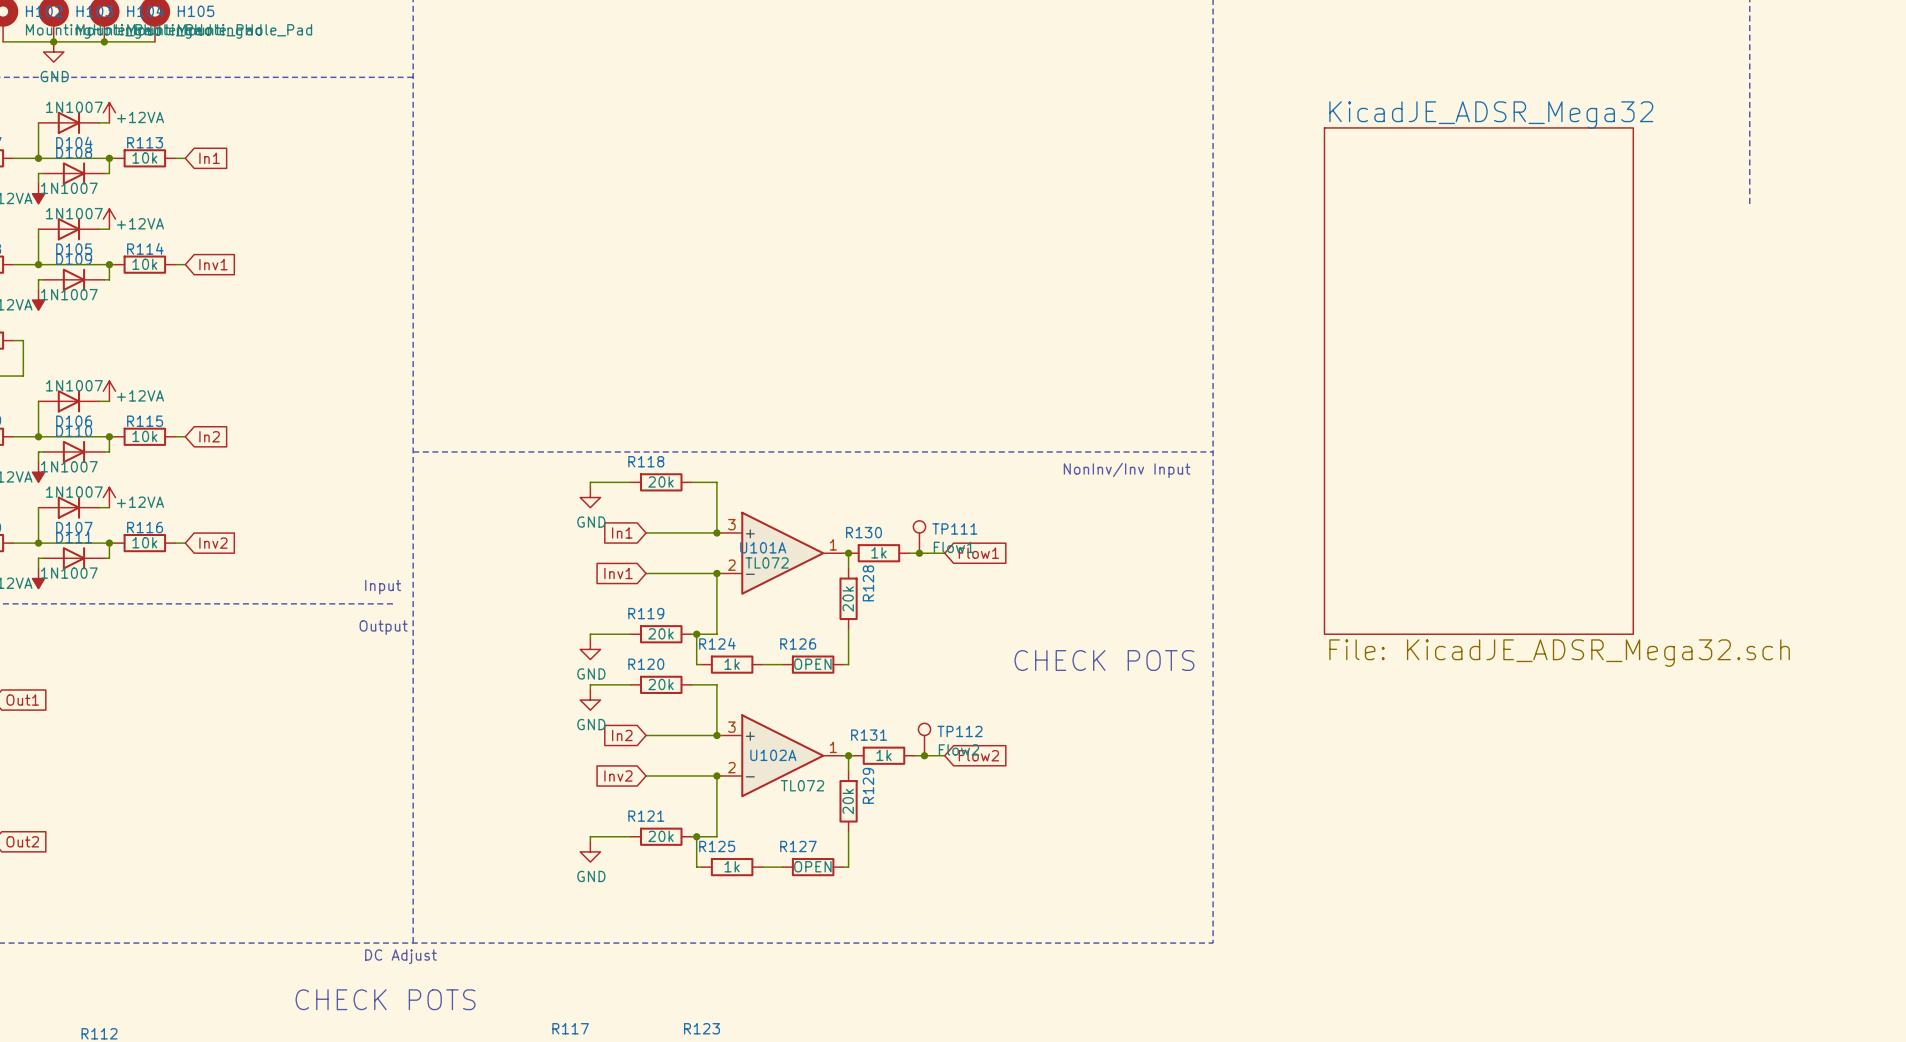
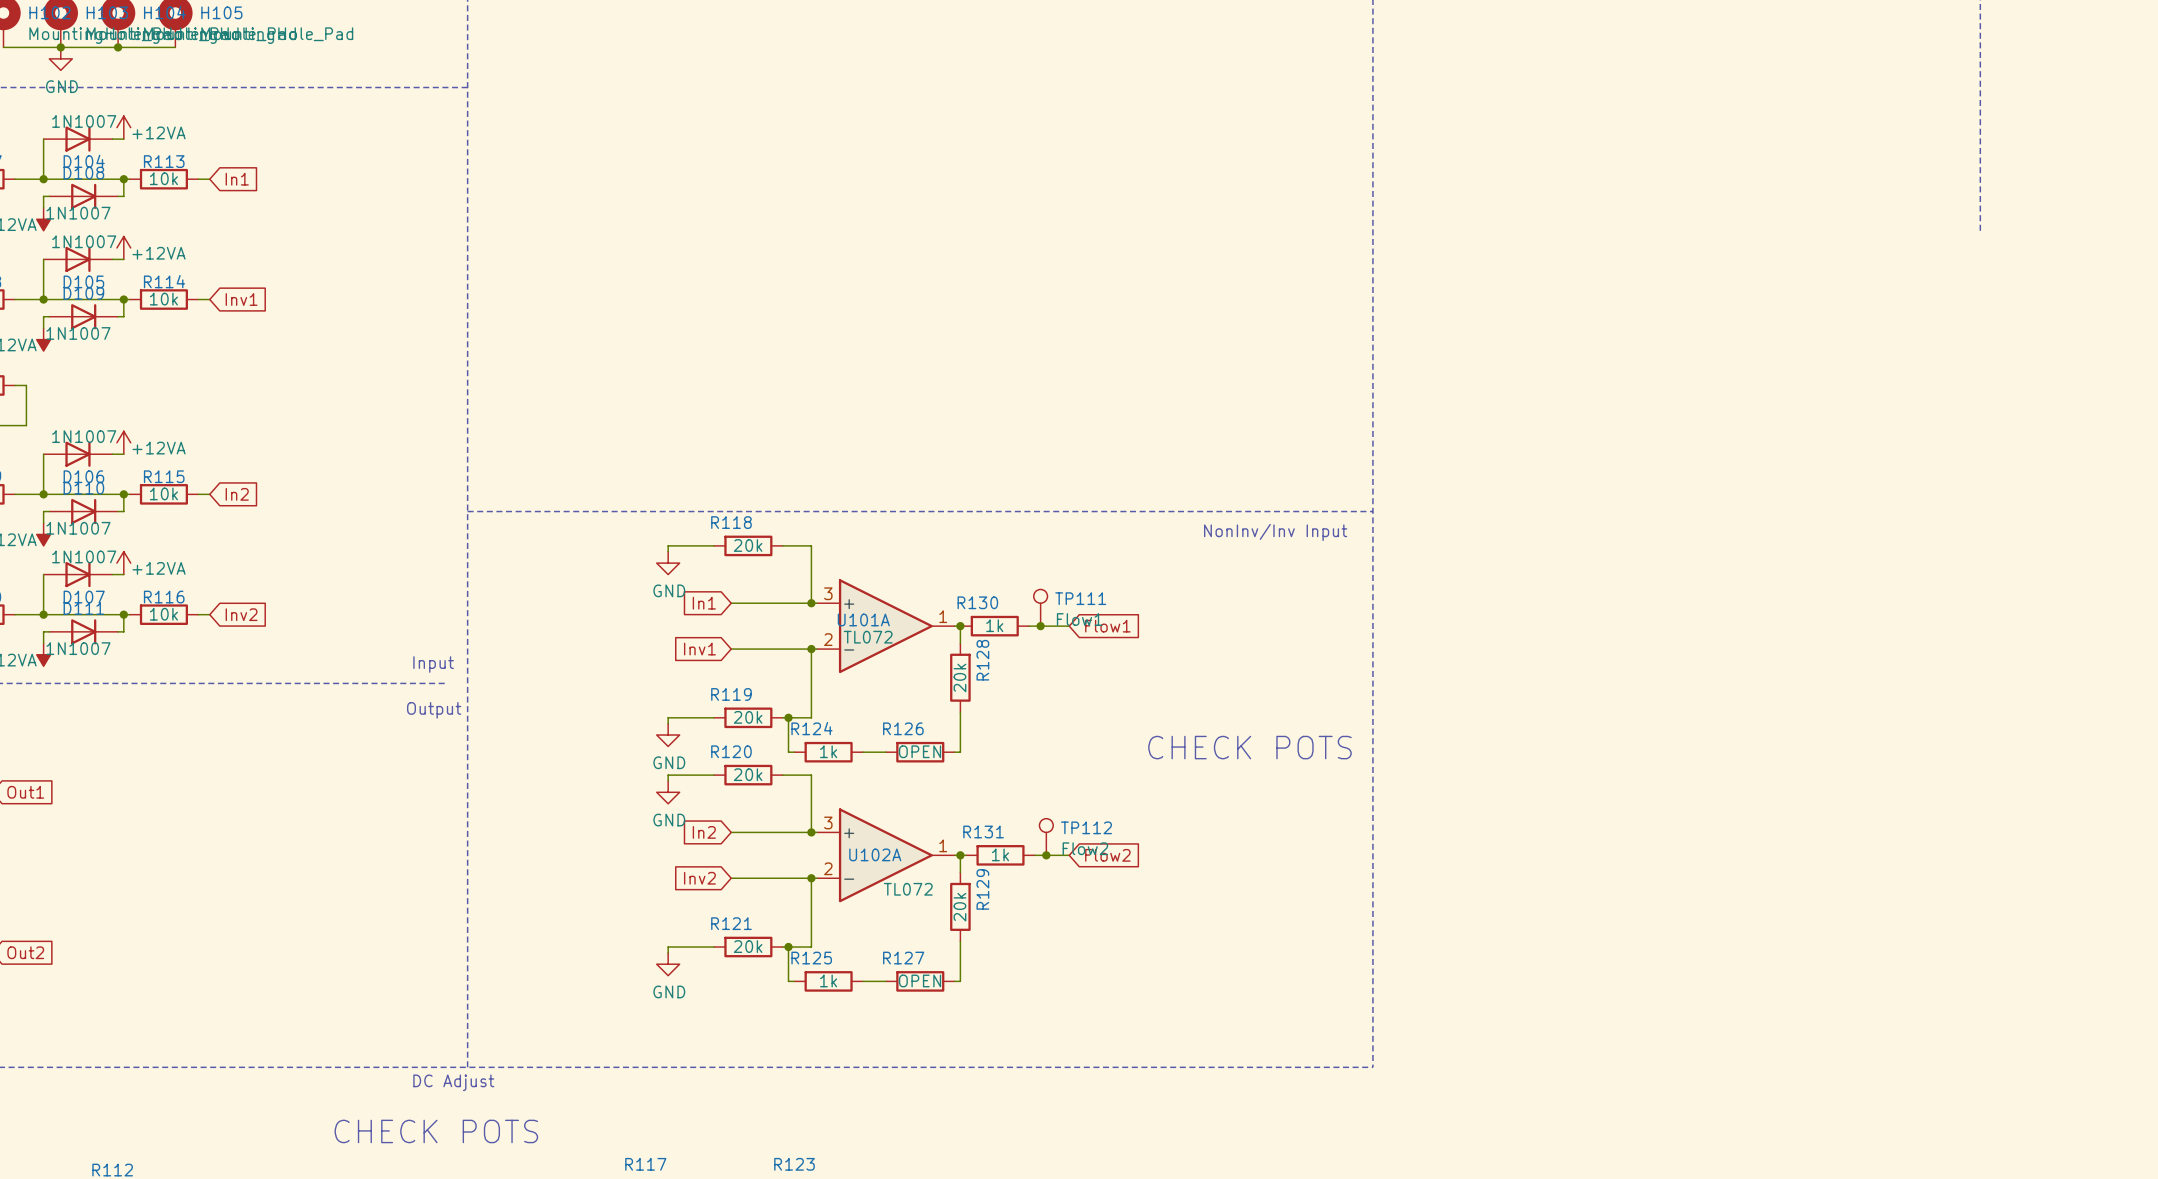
sheet KicadJE_ADSR_Mega32: File: KicadJE_ADSR_Mega32.sch (1478, 381) -> none

